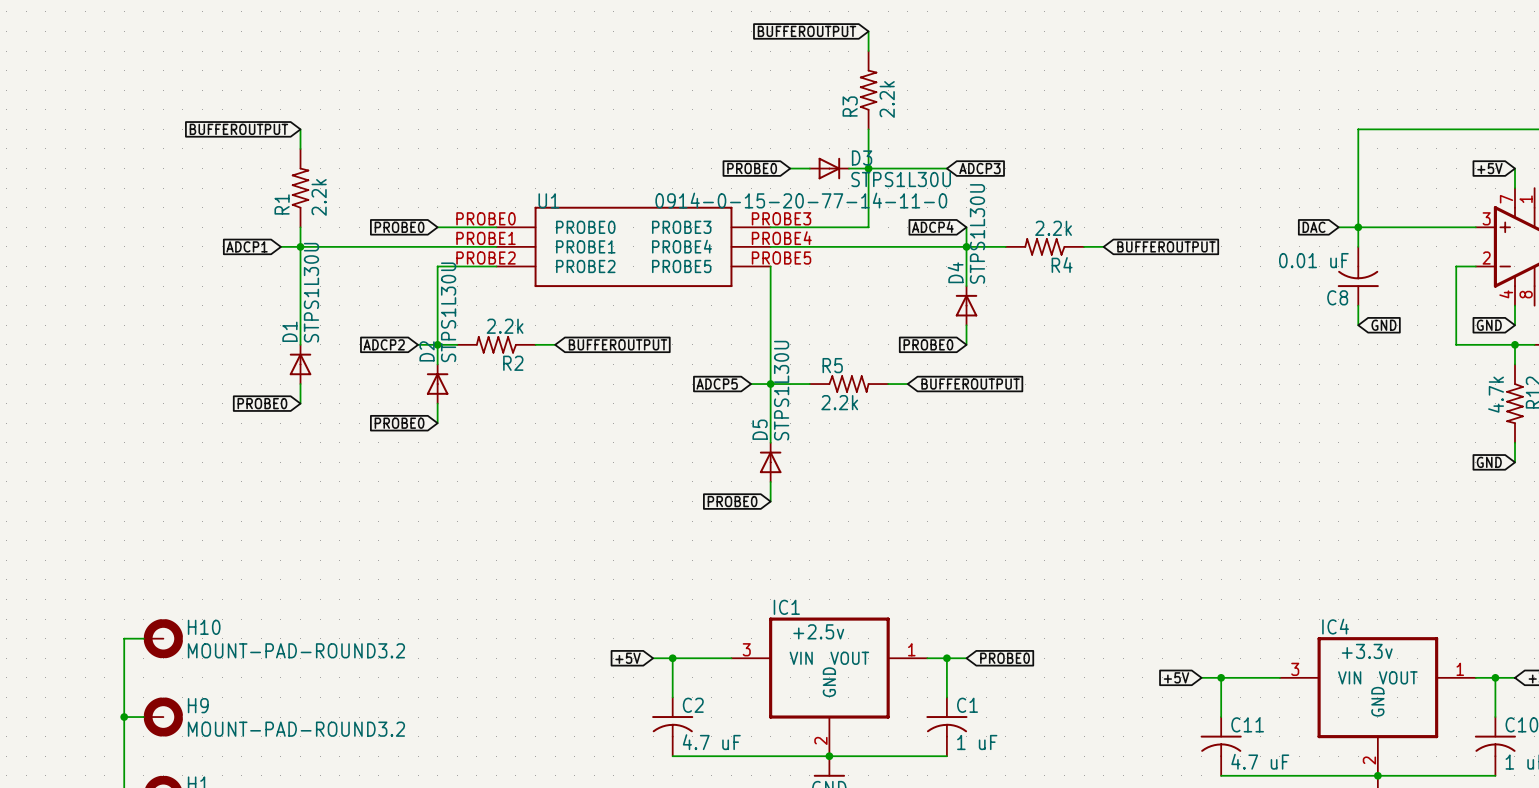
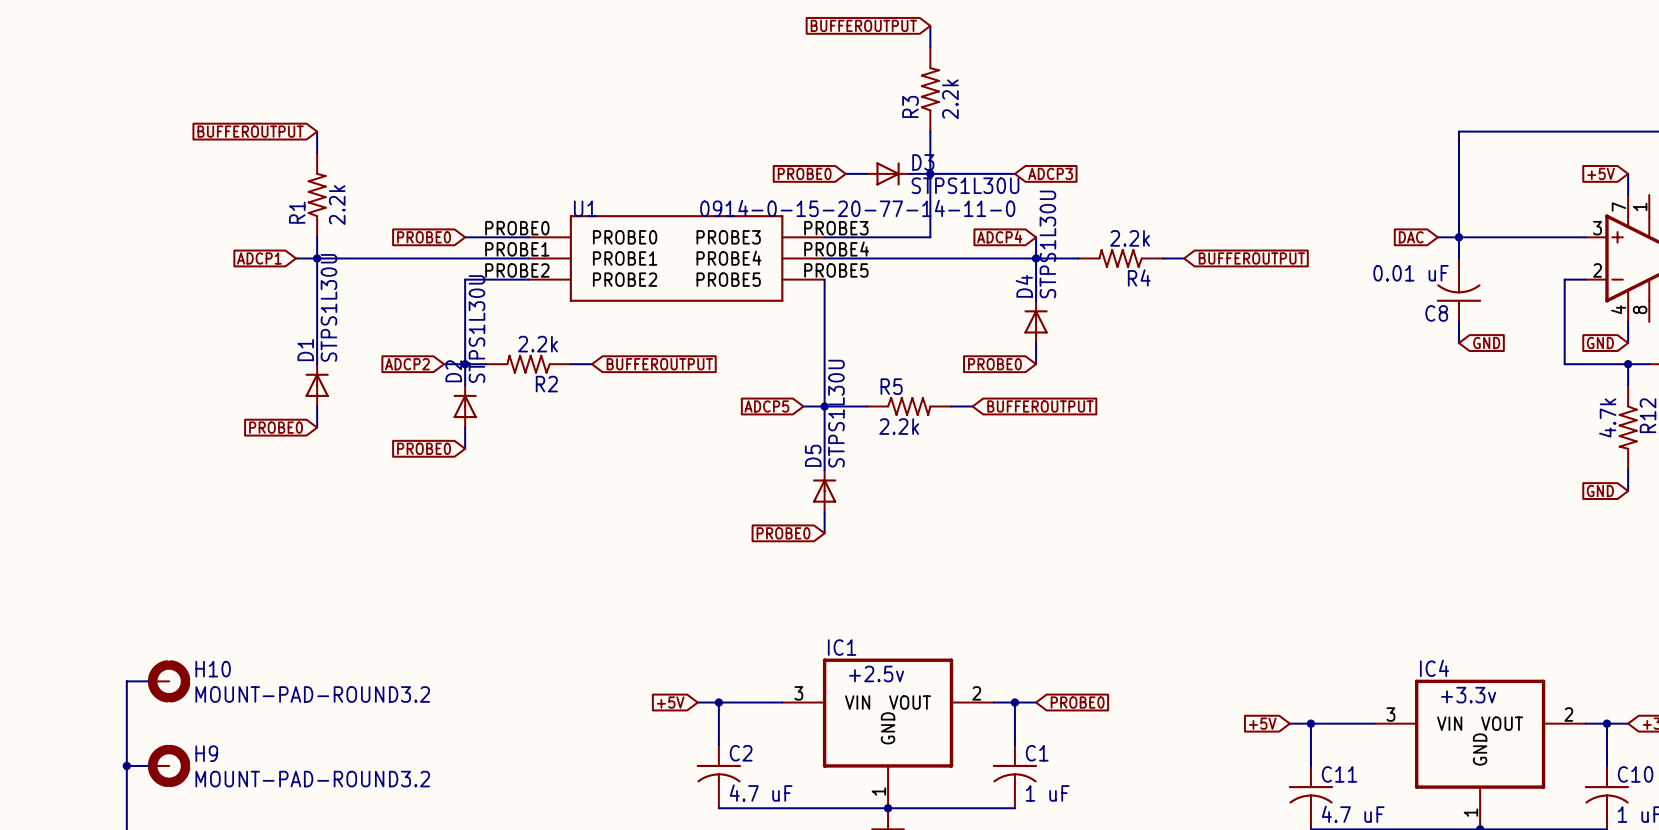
IC1 pin number: 1 (911, 649) -> 2 (976, 693)
IC4 pin number: 1 (1460, 669) -> 2 (1568, 714)
IC1 pin number: 2 (820, 740) -> 1 (878, 791)
IC4 pin number: 2 (1369, 760) -> 1 (1470, 812)

